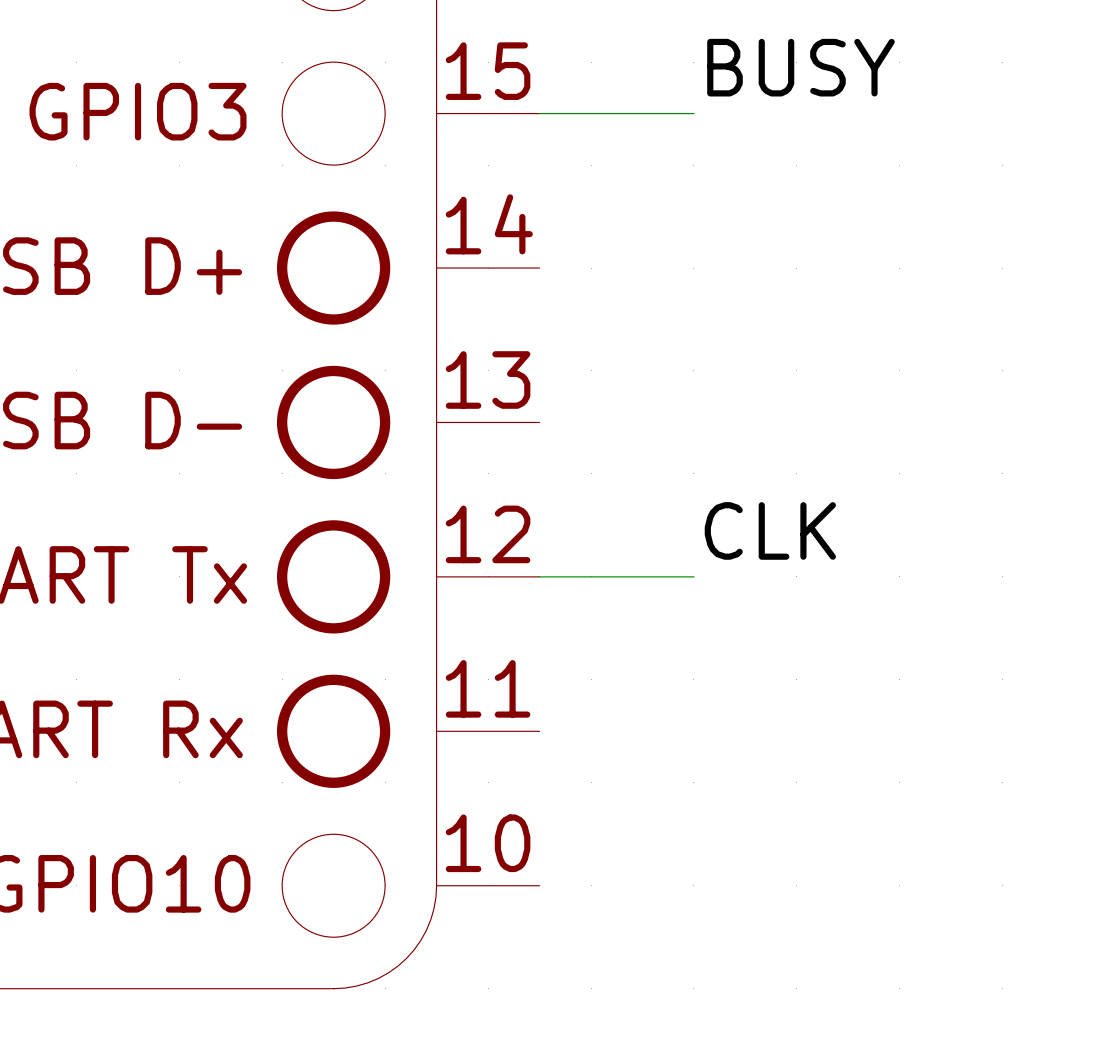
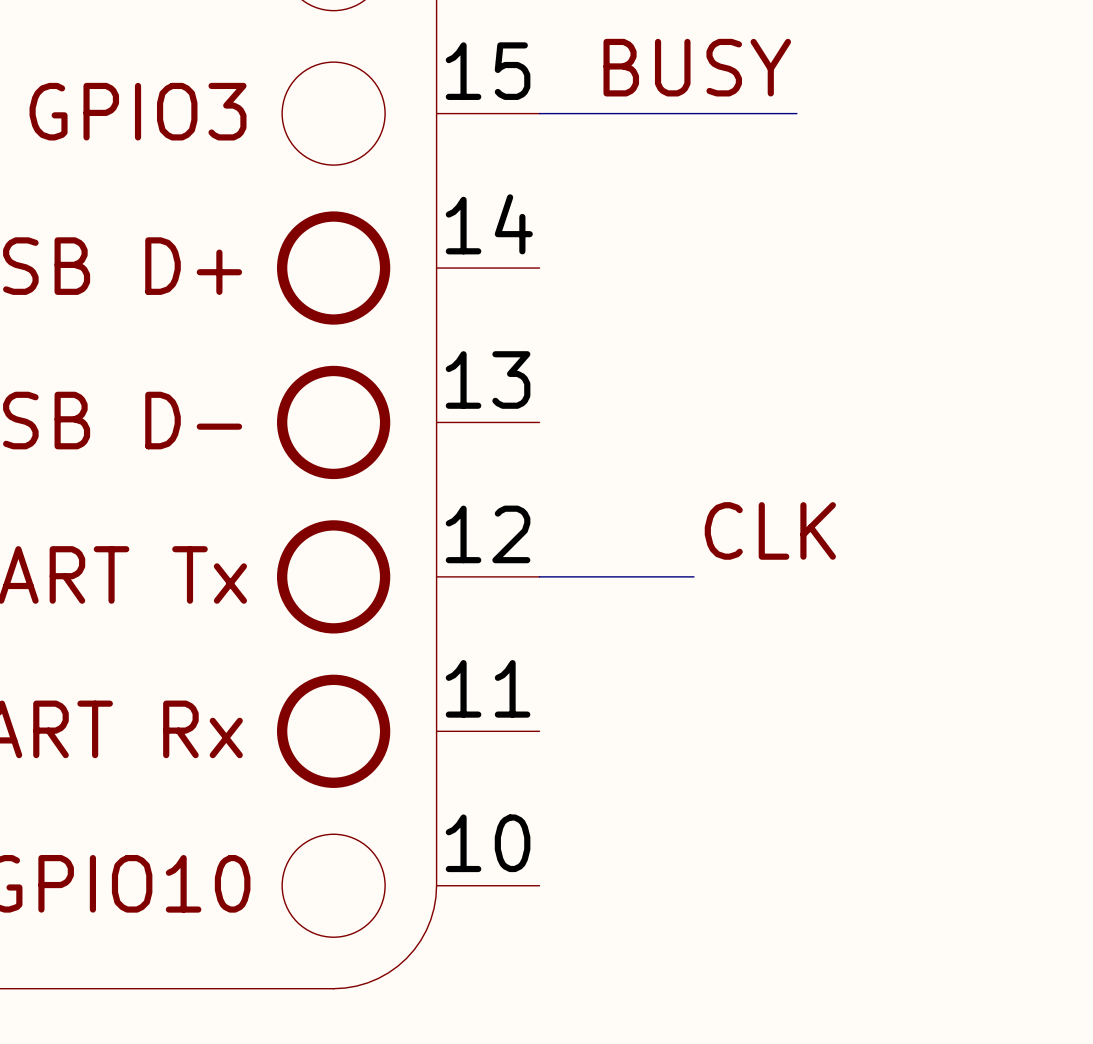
label position: BUSY (800, 67) -> BUSY (697, 67)
wire: none -> (693, 113) (796, 113)

